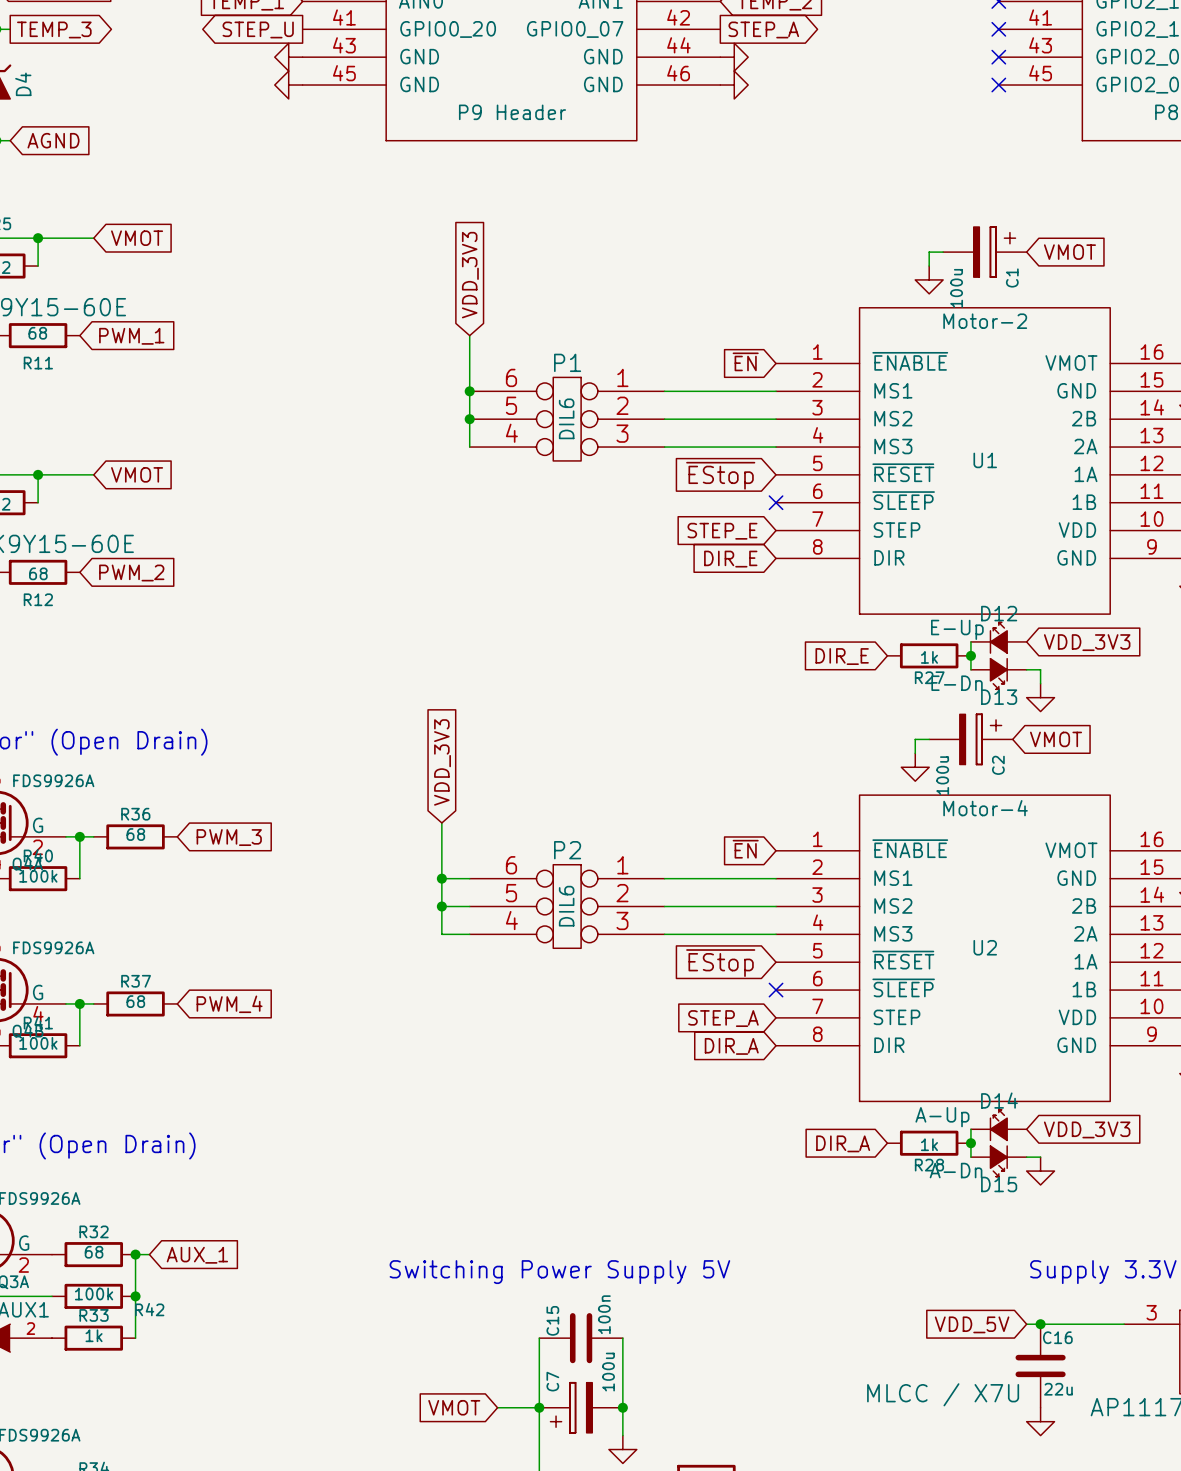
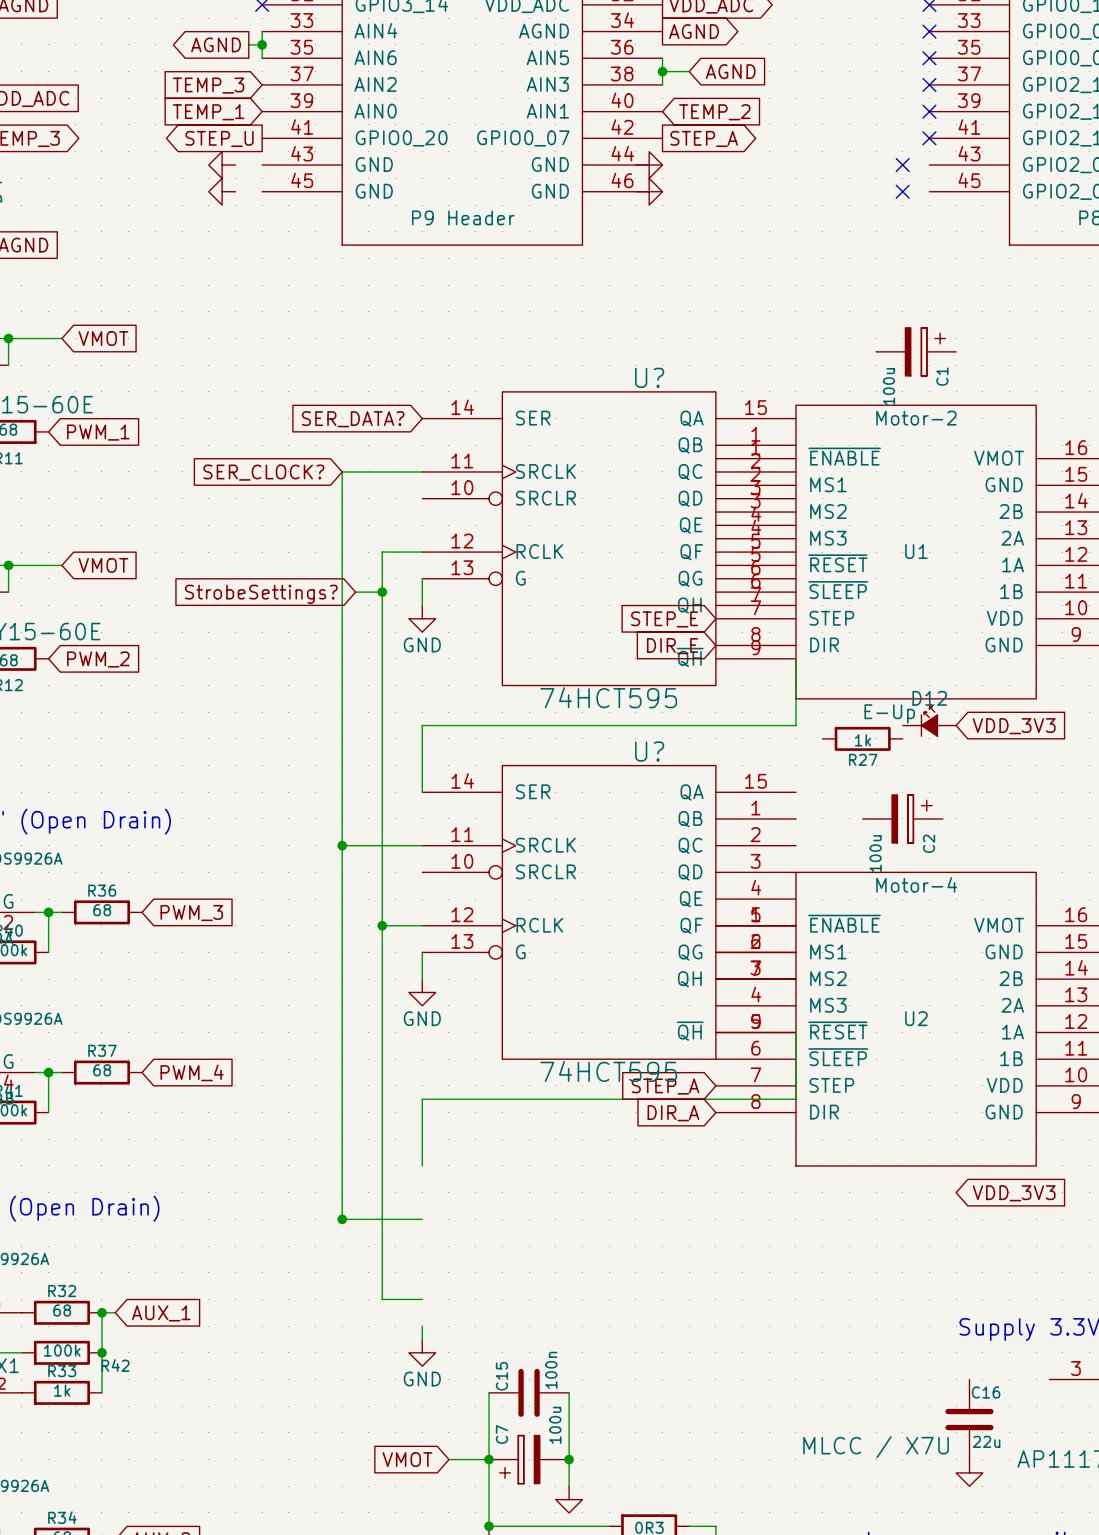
power symbol: none -> (222, 165)
power symbol: (288, 57) -> none
power symbol: none -> (649, 165)
power symbol: (734, 57) -> none
no-connect mark: none -> (902, 165)
no-connect mark: (998, 57) -> none
power symbol: none -> (222, 191)
power symbol: (288, 85) -> none
power symbol: none -> (649, 191)
power symbol: (734, 85) -> none
no-connect mark: none -> (902, 191)
no-connect mark: (998, 85) -> none
wire: (943, 252) (929, 252) (929, 266) -> none
global label: VMOT (1069, 252) -> none
global label: VDD_3V3 (470, 275) -> none
power symbol: (929, 279) -> none
global label: none -> SER_DATA? (353, 419)
wire: (469, 335) (469, 447) -> none
global label: ~{EN} (745, 361) -> none
wire: none -> (422, 471) (342, 471) (342, 1219) (422, 1219)
global label: none -> SER_CLOCK? (263, 472)
junction: (469, 391) -> none
wire: (664, 391) (776, 391) -> none
junction: (469, 419) -> none
P1: DIL6 (567, 419) -> none
wire: (664, 419) (776, 419) -> none
wire: (664, 447) (776, 447) -> none
U?: none -> 74HCT595 (609, 538)
wire: none -> (422, 552) (382, 552) (382, 1299) (422, 1299)
global label: ~{EStop} (720, 475) -> none
wire: none -> (422, 578) (422, 605)
wire: none -> (355, 592) (382, 592)
junction: none -> (382, 592)
no-connect mark: (776, 502) -> none
global label: none -> StrobeSettings? (261, 594)
power symbol: none -> GND (422, 618)
wire: none -> (795, 658) (795, 725) (422, 725) (422, 792)
wire: (970, 641) (970, 669) -> none
junction: (970, 655) -> none
global label: DIR_E (842, 656) -> none
wire: (1026, 669) (1040, 669) (1040, 683) -> none
D13: E-Dn (998, 673) -> none
power symbol: (1040, 697) -> none
wire: (929, 739) (915, 739) (915, 753) -> none
global label: VMOT (1056, 739) -> none
global label: VDD_3V3 (442, 762) -> none
wire: none -> (342, 845) (422, 845)
junction: none -> (342, 845)
power symbol: (915, 767) -> none
wire: (441, 822) (441, 934) (469, 934) -> none
U?: none -> 74HCT595 (609, 912)
global label: ~{EN} (745, 849) -> none
wire: none -> (382, 925) (422, 925)
junction: none -> (382, 925)
wire: (441, 878) (469, 878) -> (422, 979) (422, 952)
junction: (441, 878) -> none
wire: (664, 878) (776, 878) -> none
wire: (441, 906) (469, 906) -> none
junction: (441, 906) -> none
P2: DIL6 (567, 906) -> none
wire: (664, 906) (776, 906) -> none
power symbol: none -> GND (422, 992)
wire: (664, 934) (776, 934) -> none
wire: none -> (795, 1032) (795, 1099) (422, 1099) (422, 1165)
global label: ~{EStop} (720, 963) -> none
no-connect mark: (776, 990) -> none
D14: A-Up (998, 1125) -> none
wire: (970, 1129) (970, 1157) -> none
global label: DIR_A (843, 1143) -> none
R28: 1k (929, 1143) -> none
junction: (970, 1143) -> none
junction: none -> (342, 1219)
wire: (1026, 1157) (1040, 1157) -> none
D15: A-Dn (998, 1161) -> none
power symbol: (1040, 1171) -> none
wire: none -> (422, 1326) (422, 1339)
text: Switching Power Supply 5V (559, 1272) -> none
power symbol: none -> GND (422, 1352)
global label: VDD_5V (972, 1324) -> none
wire: (1026, 1324) (1124, 1324) -> none
junction: (1040, 1324) -> none

